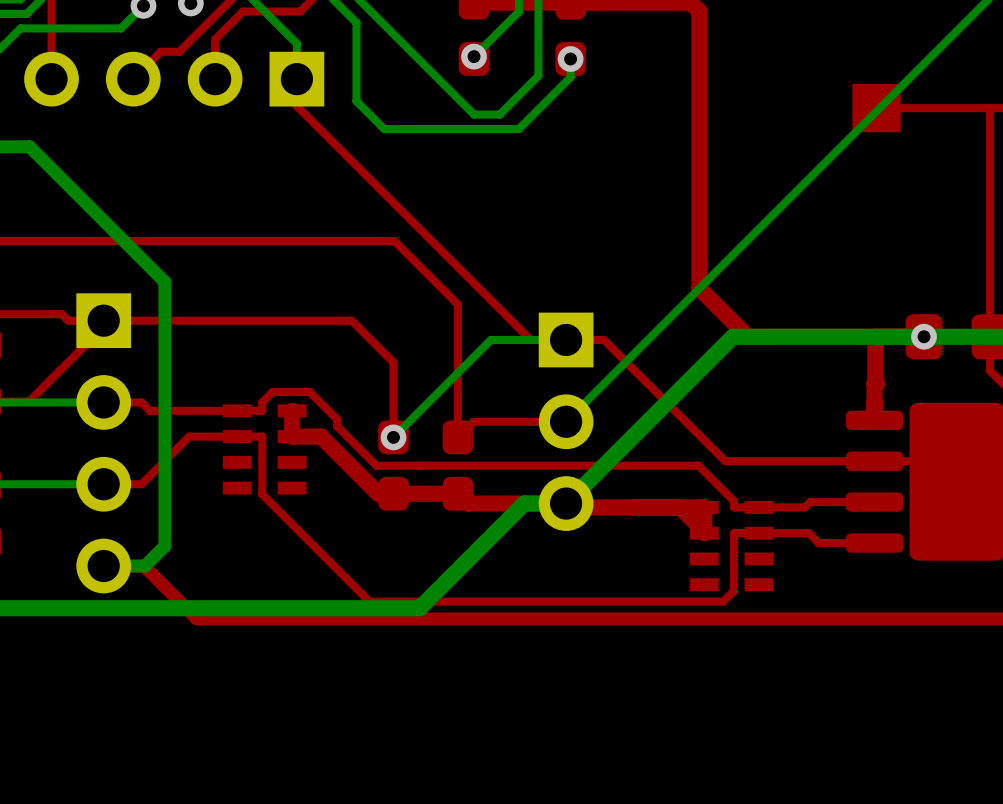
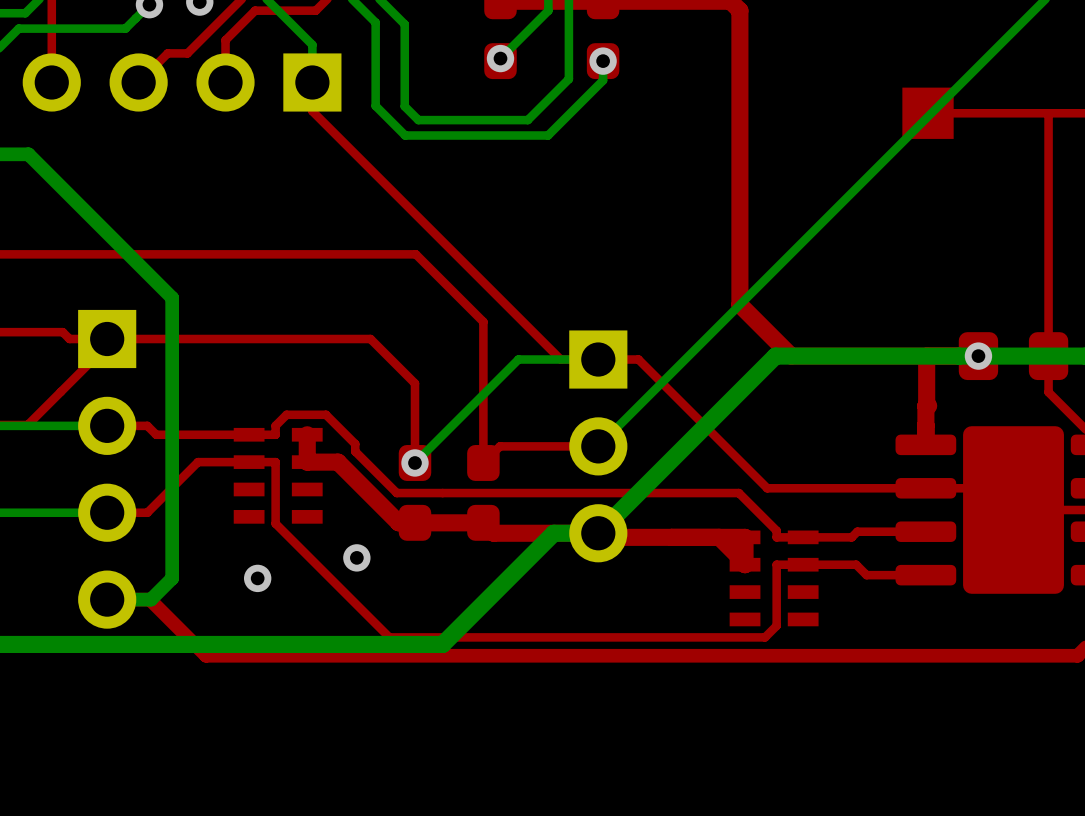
bottom track: (383, 24) (474, 114) -> (404, 24) (404, 106) (418, 120) (500, 120)
via: none -> (356, 557)
via: none -> (257, 578)

